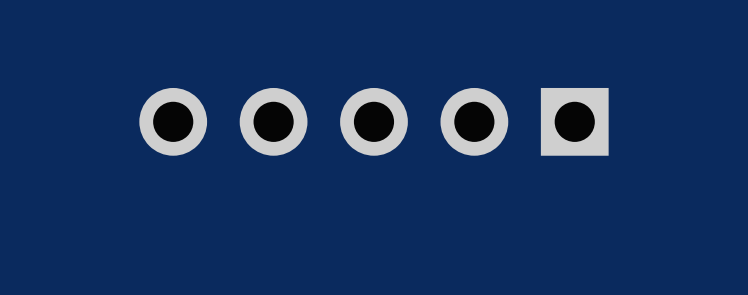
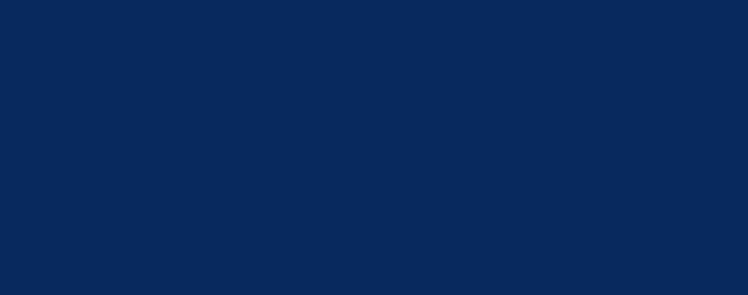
part: (373, 121) -> none

